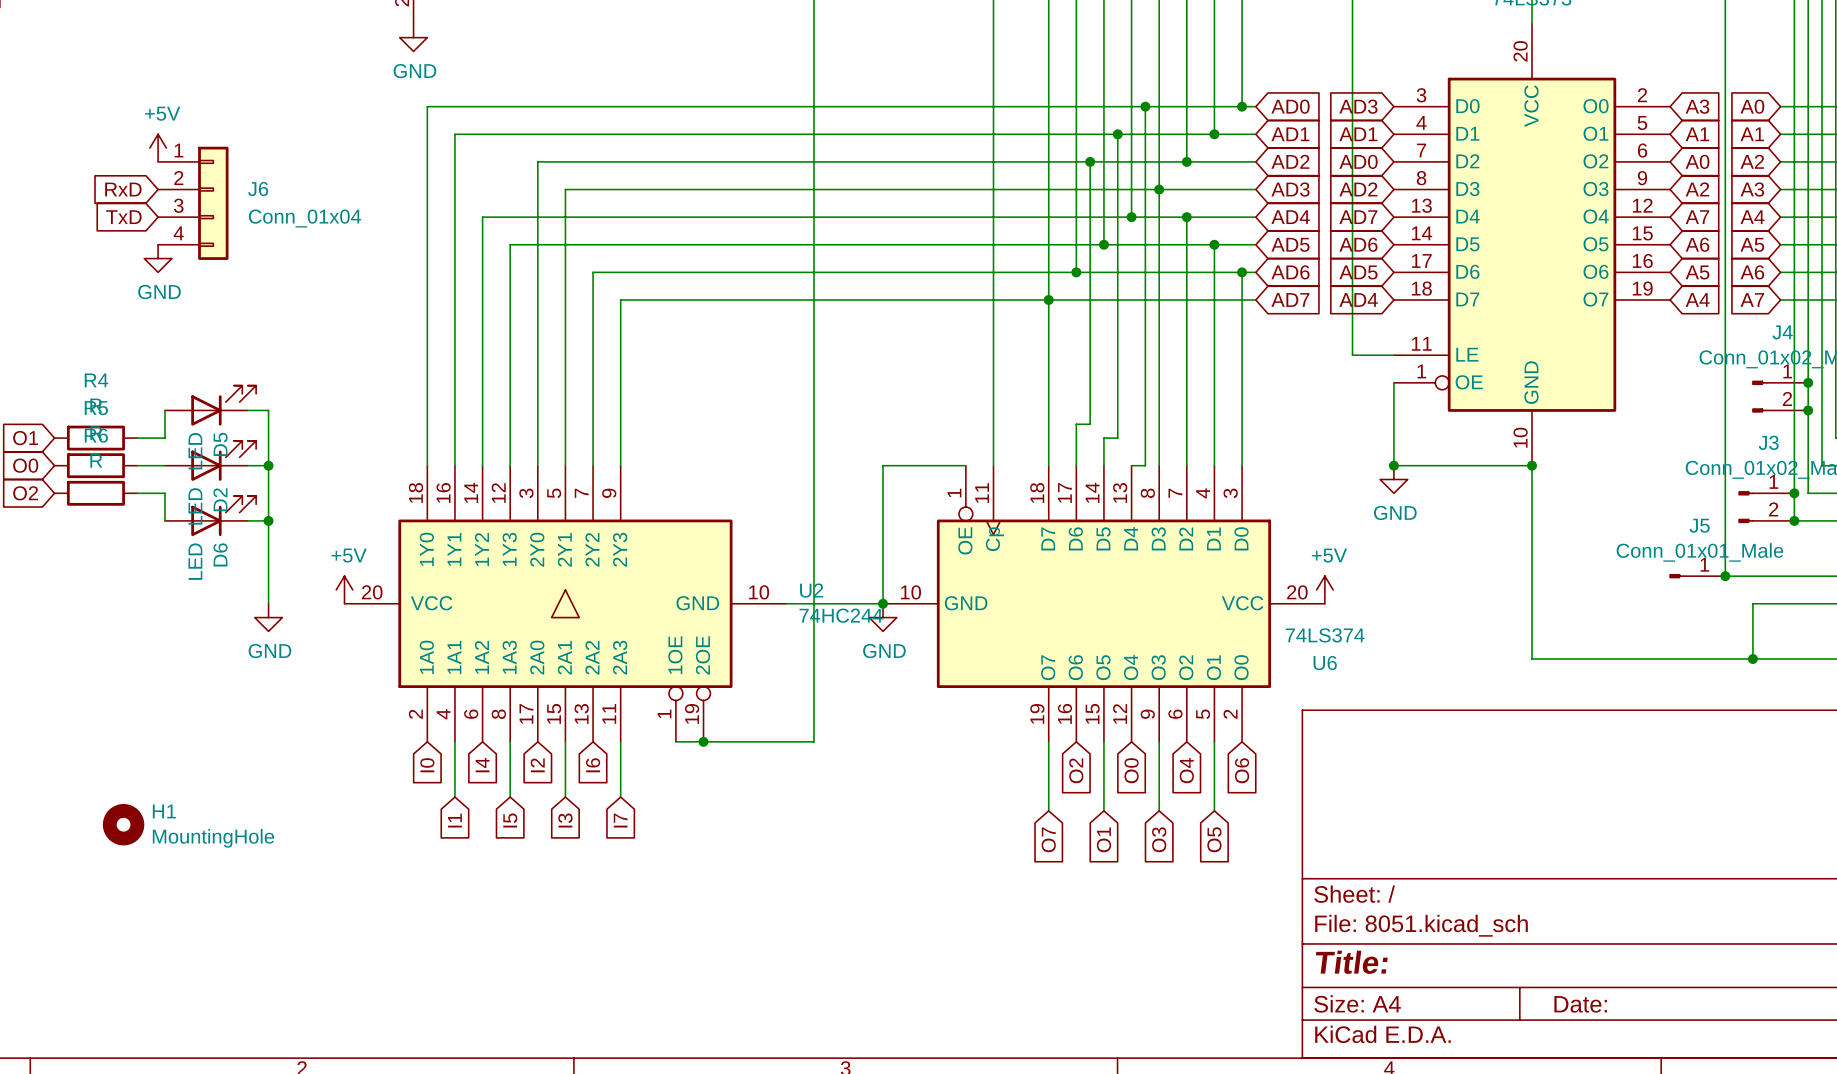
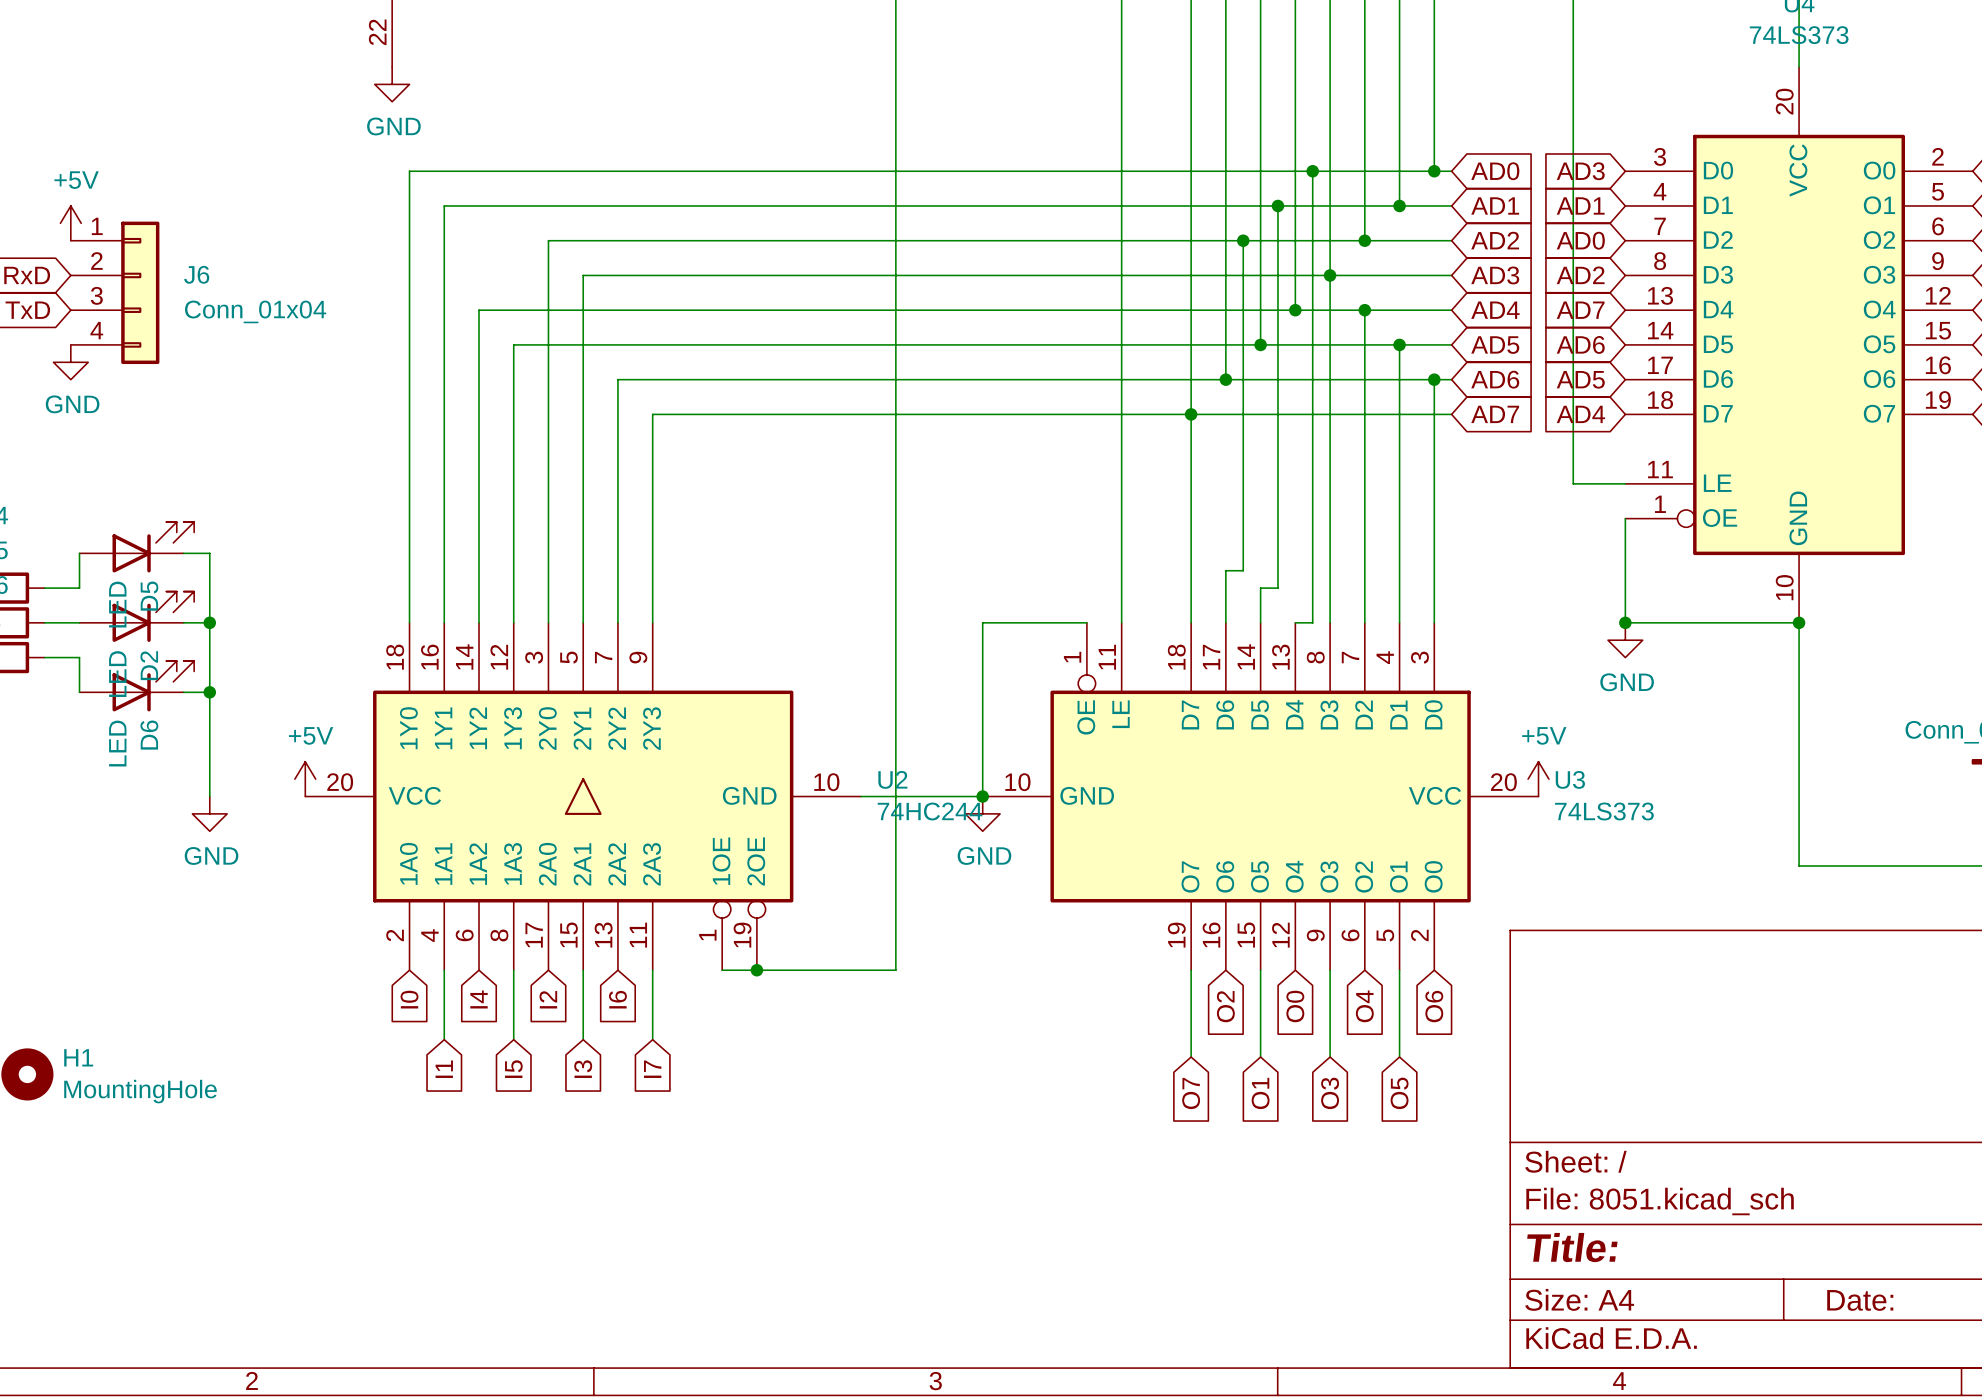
U6: 74LS374 (1103, 603) -> none
U3: none -> 74LS373 (1260, 796)

